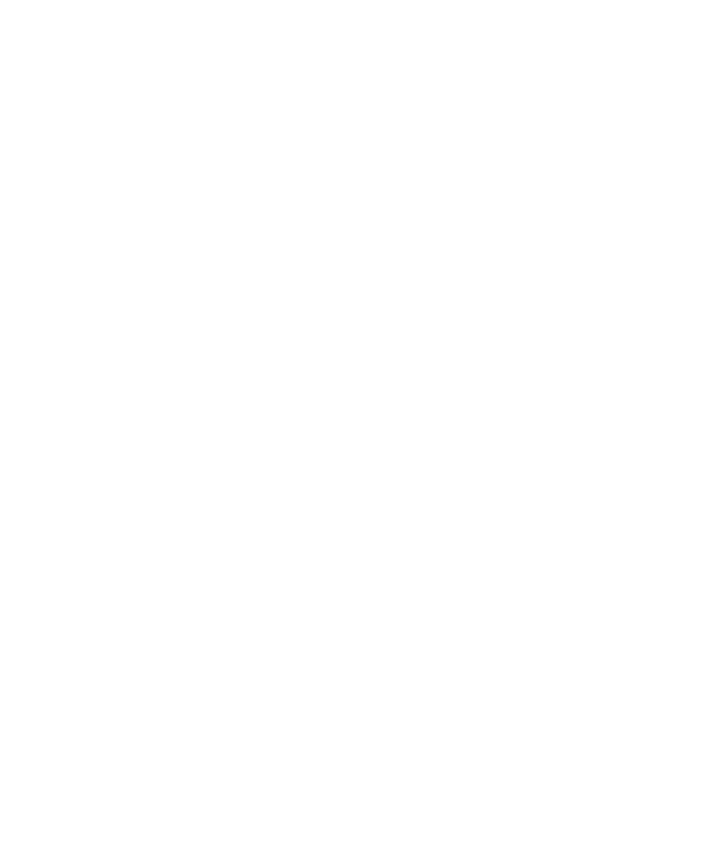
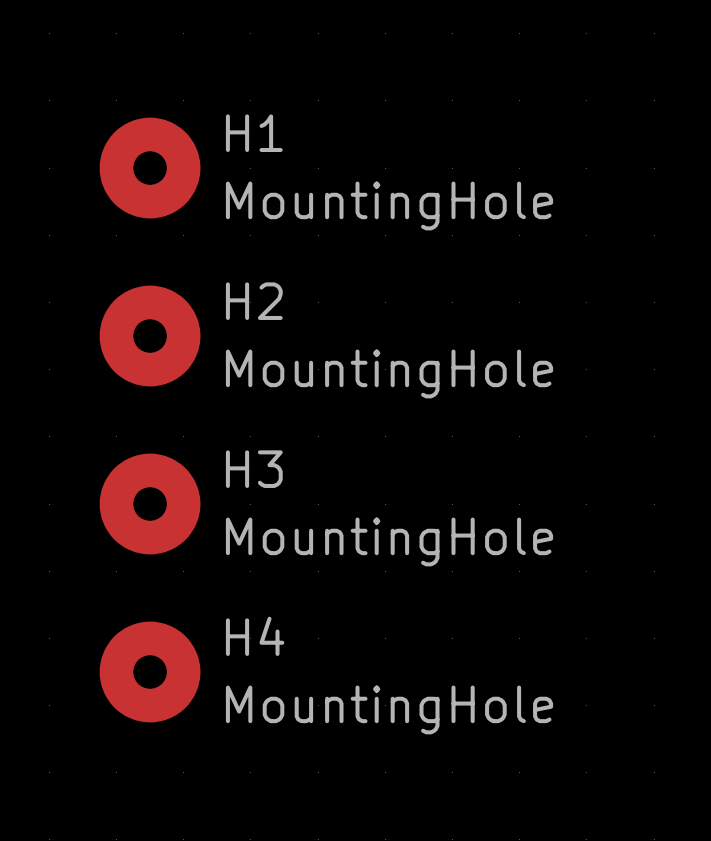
H1: none -> MountingHole (150, 168)
H2: none -> MountingHole (150, 336)
H3: none -> MountingHole (150, 504)
H4: none -> MountingHole (150, 672)

